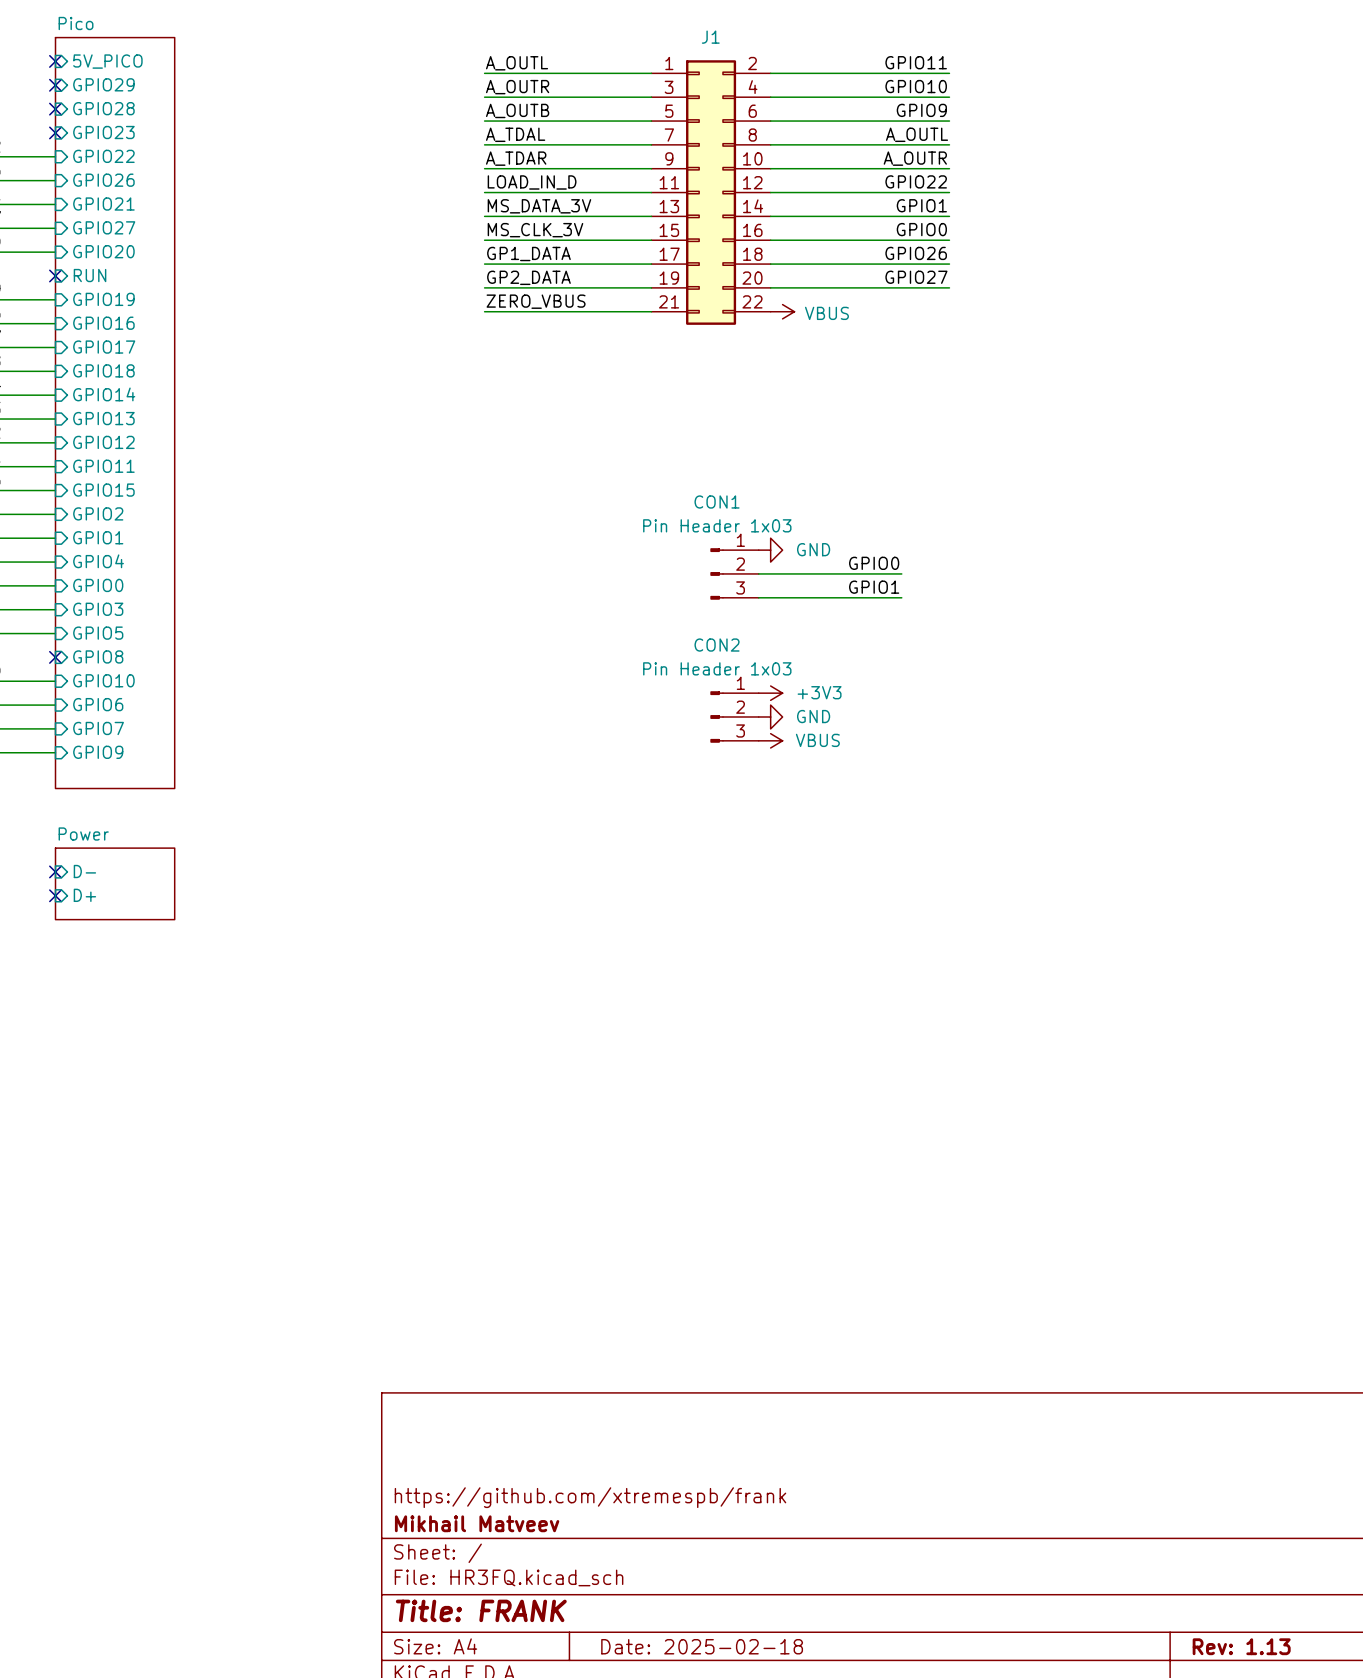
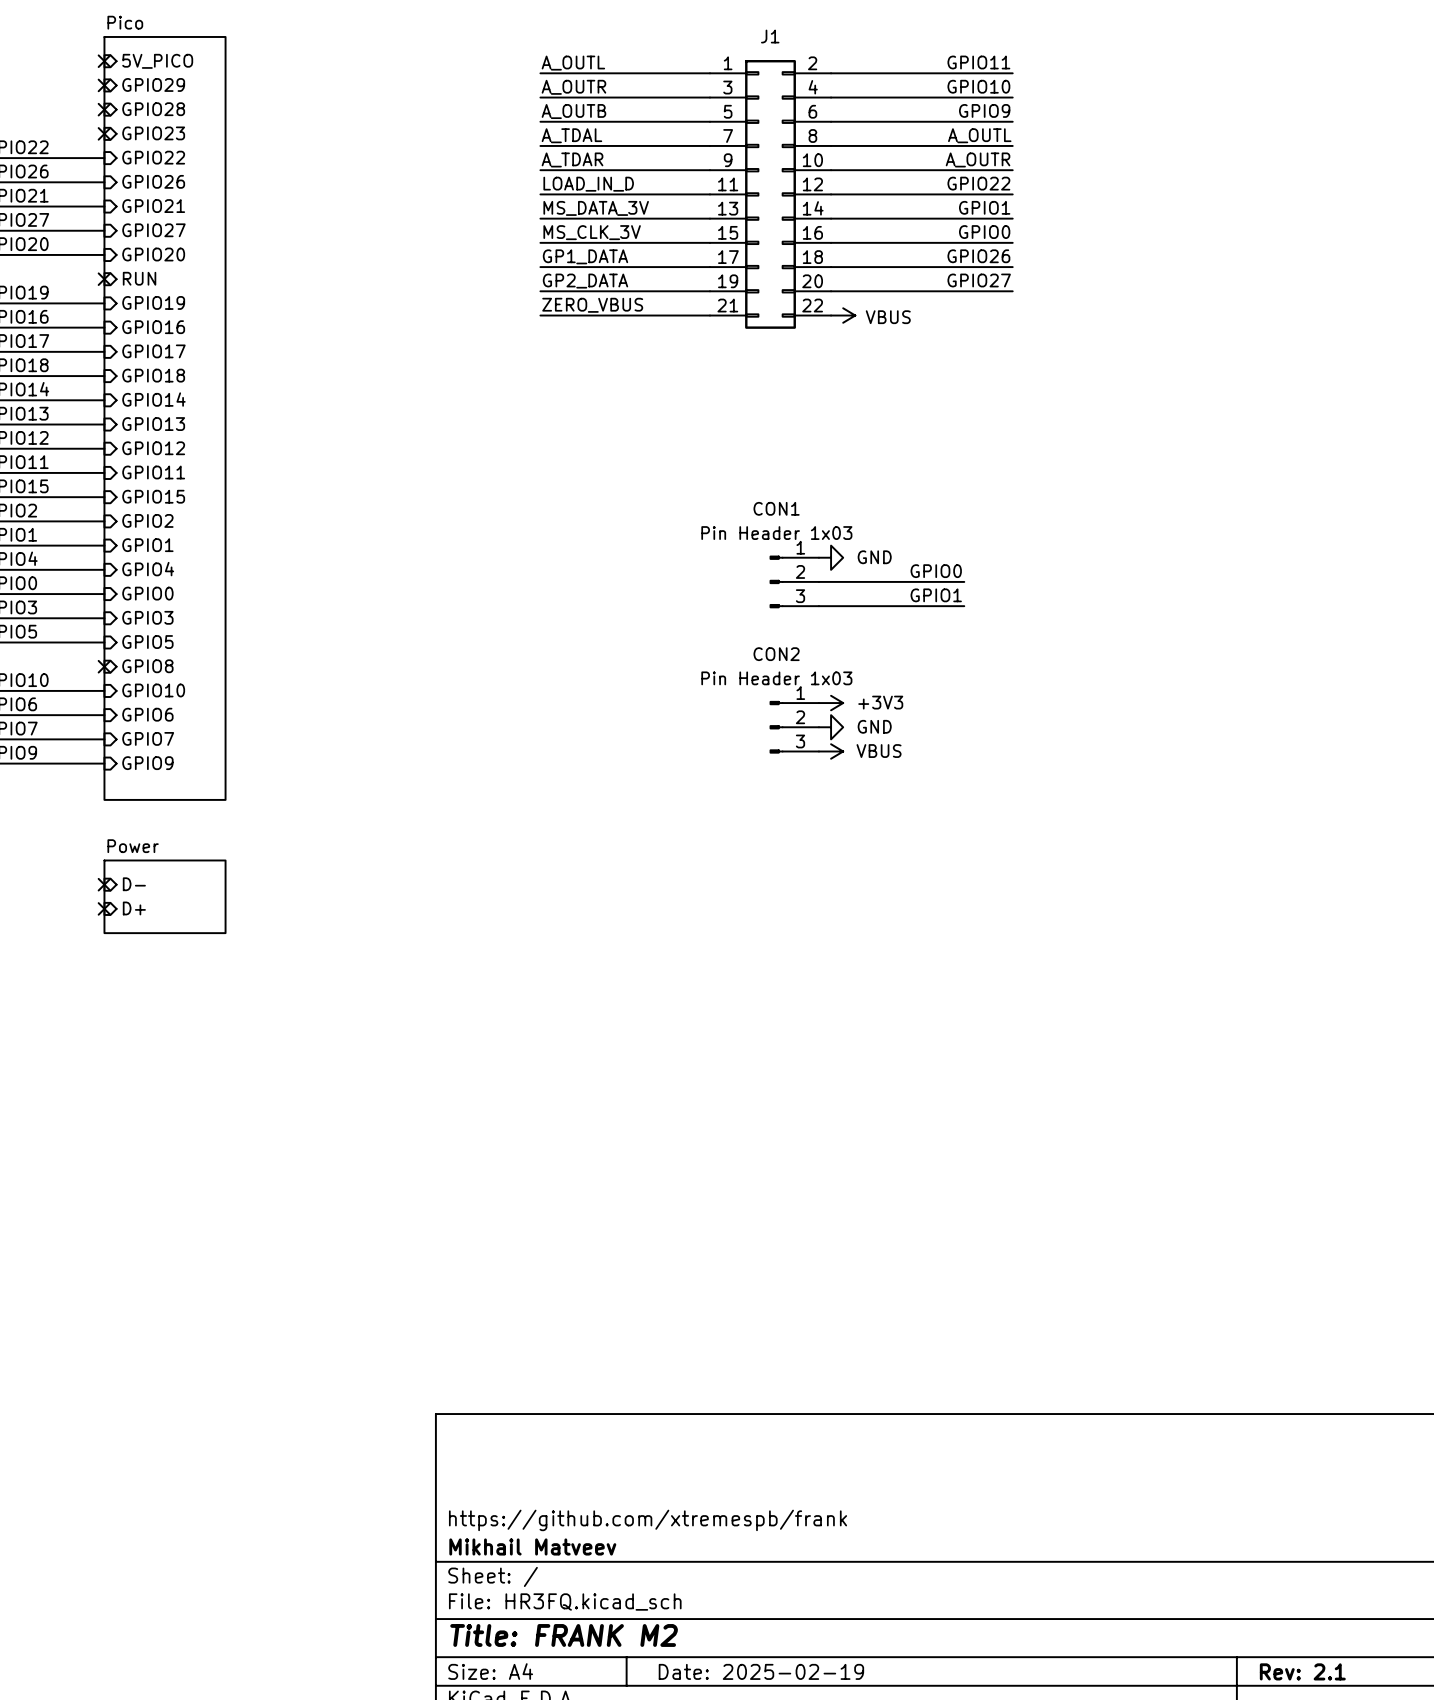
title block: Title: FRANK (481, 1610) -> Title: FRANK M2 (564, 1635)
title block: Date: 2025-02-18 (702, 1646) -> Date: 2025-02-19 (761, 1671)
title block: Rev: 1.13 (1241, 1646) -> Rev: 2.1 (1302, 1671)

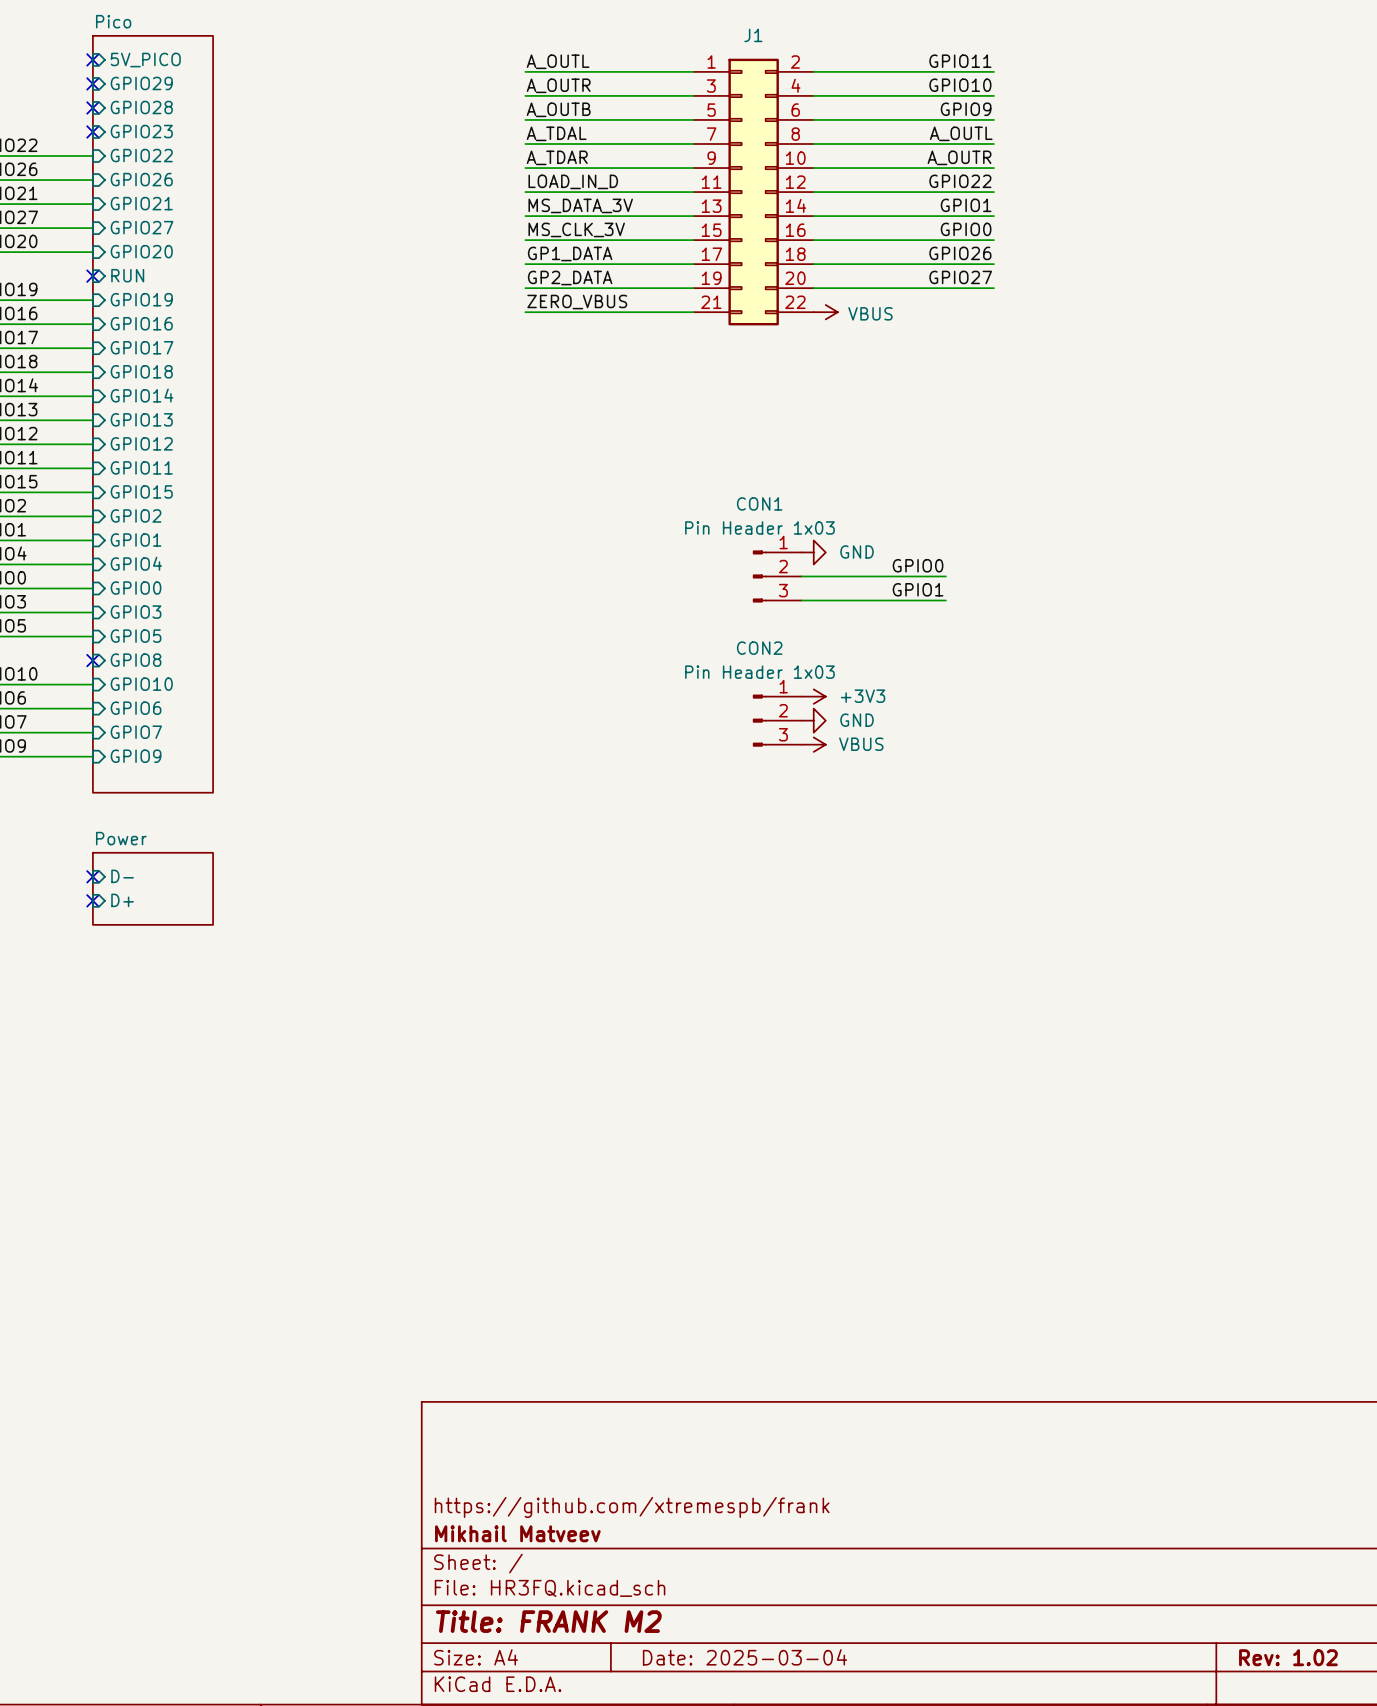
title block: Date: 2025-02-19 (761, 1671) -> Date: 2025-03-04 (744, 1657)
title block: Rev: 2.1 (1302, 1671) -> Rev: 1.02 (1288, 1657)

